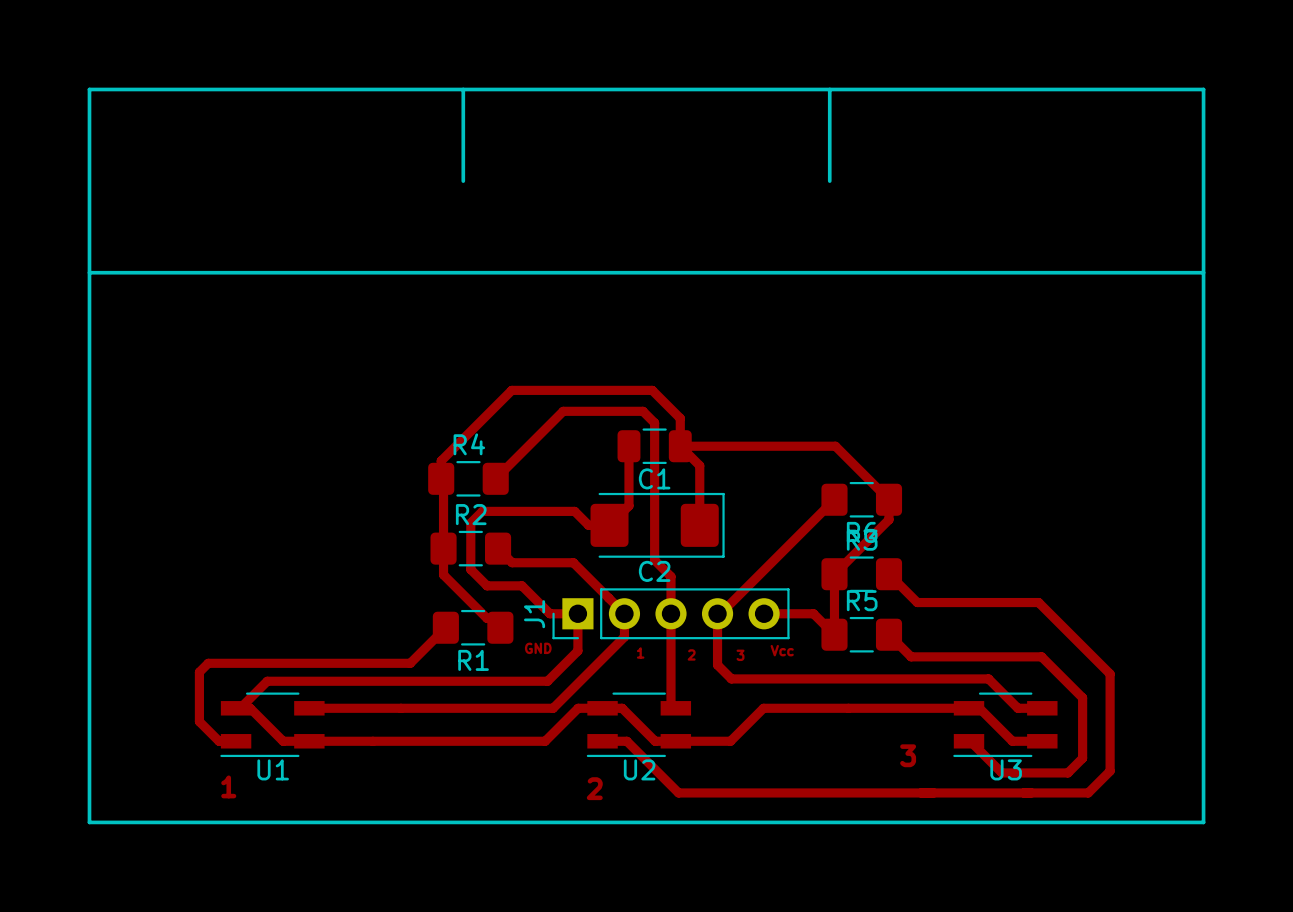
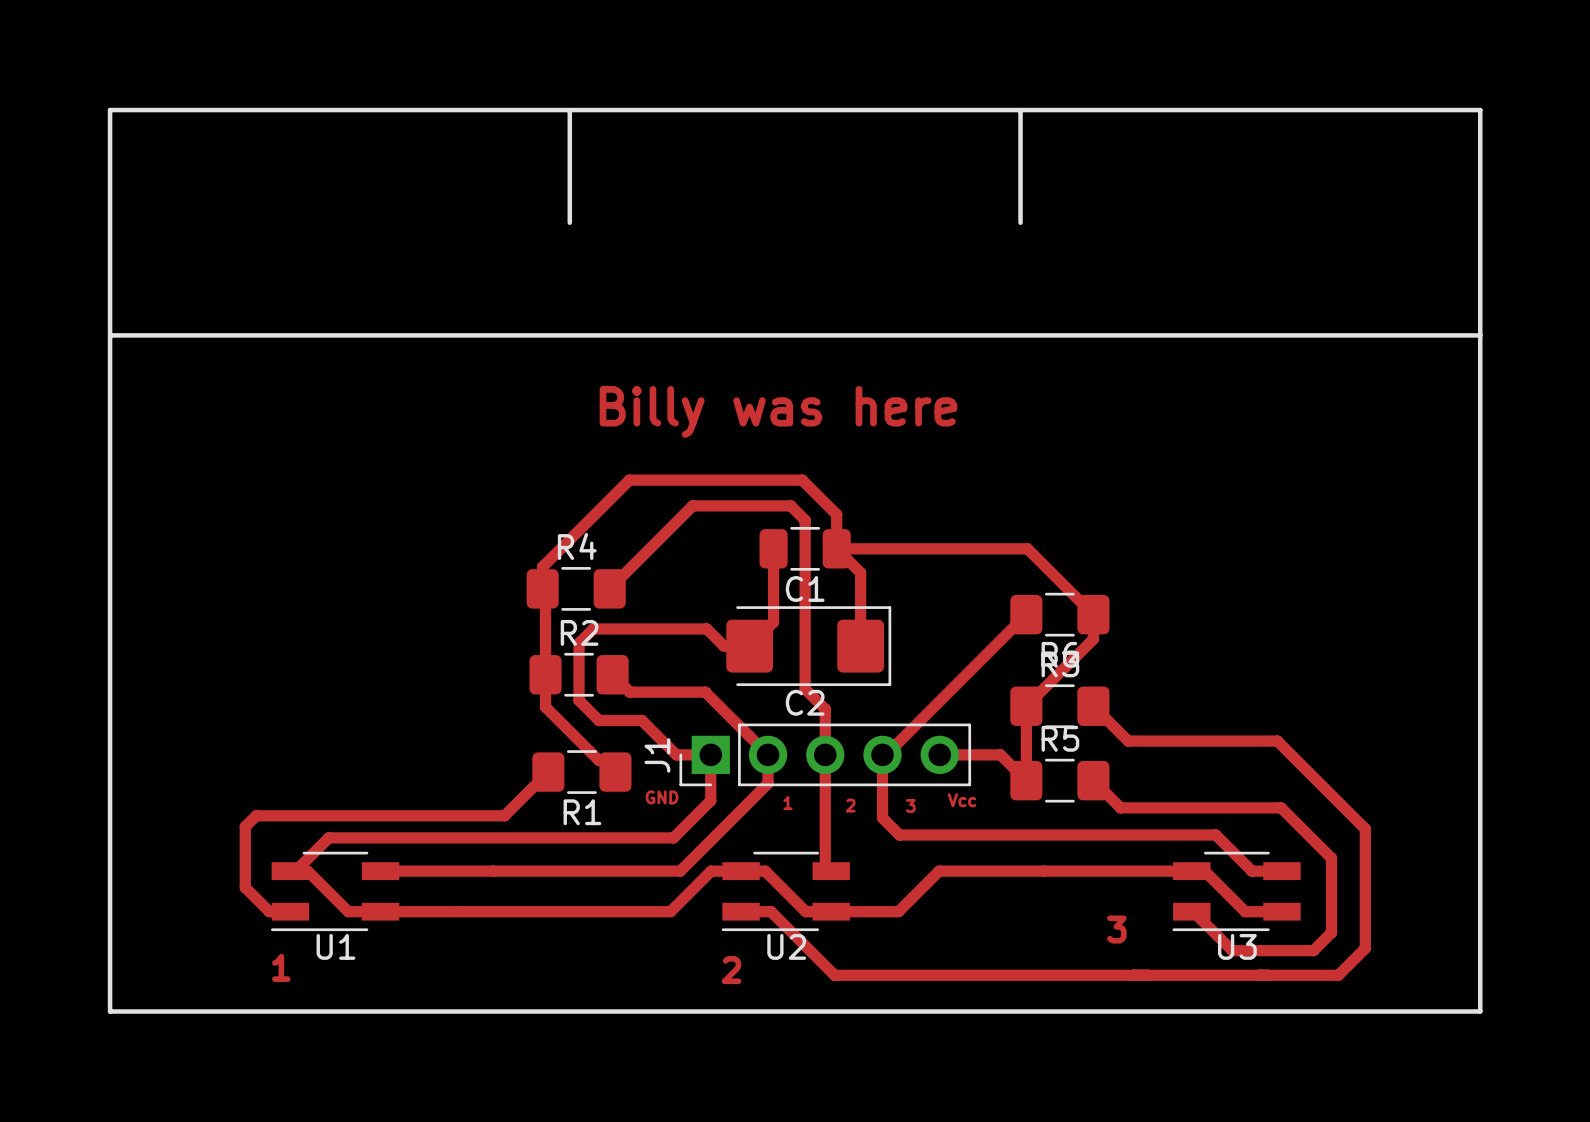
text: none -> Billy was here (778, 411)

